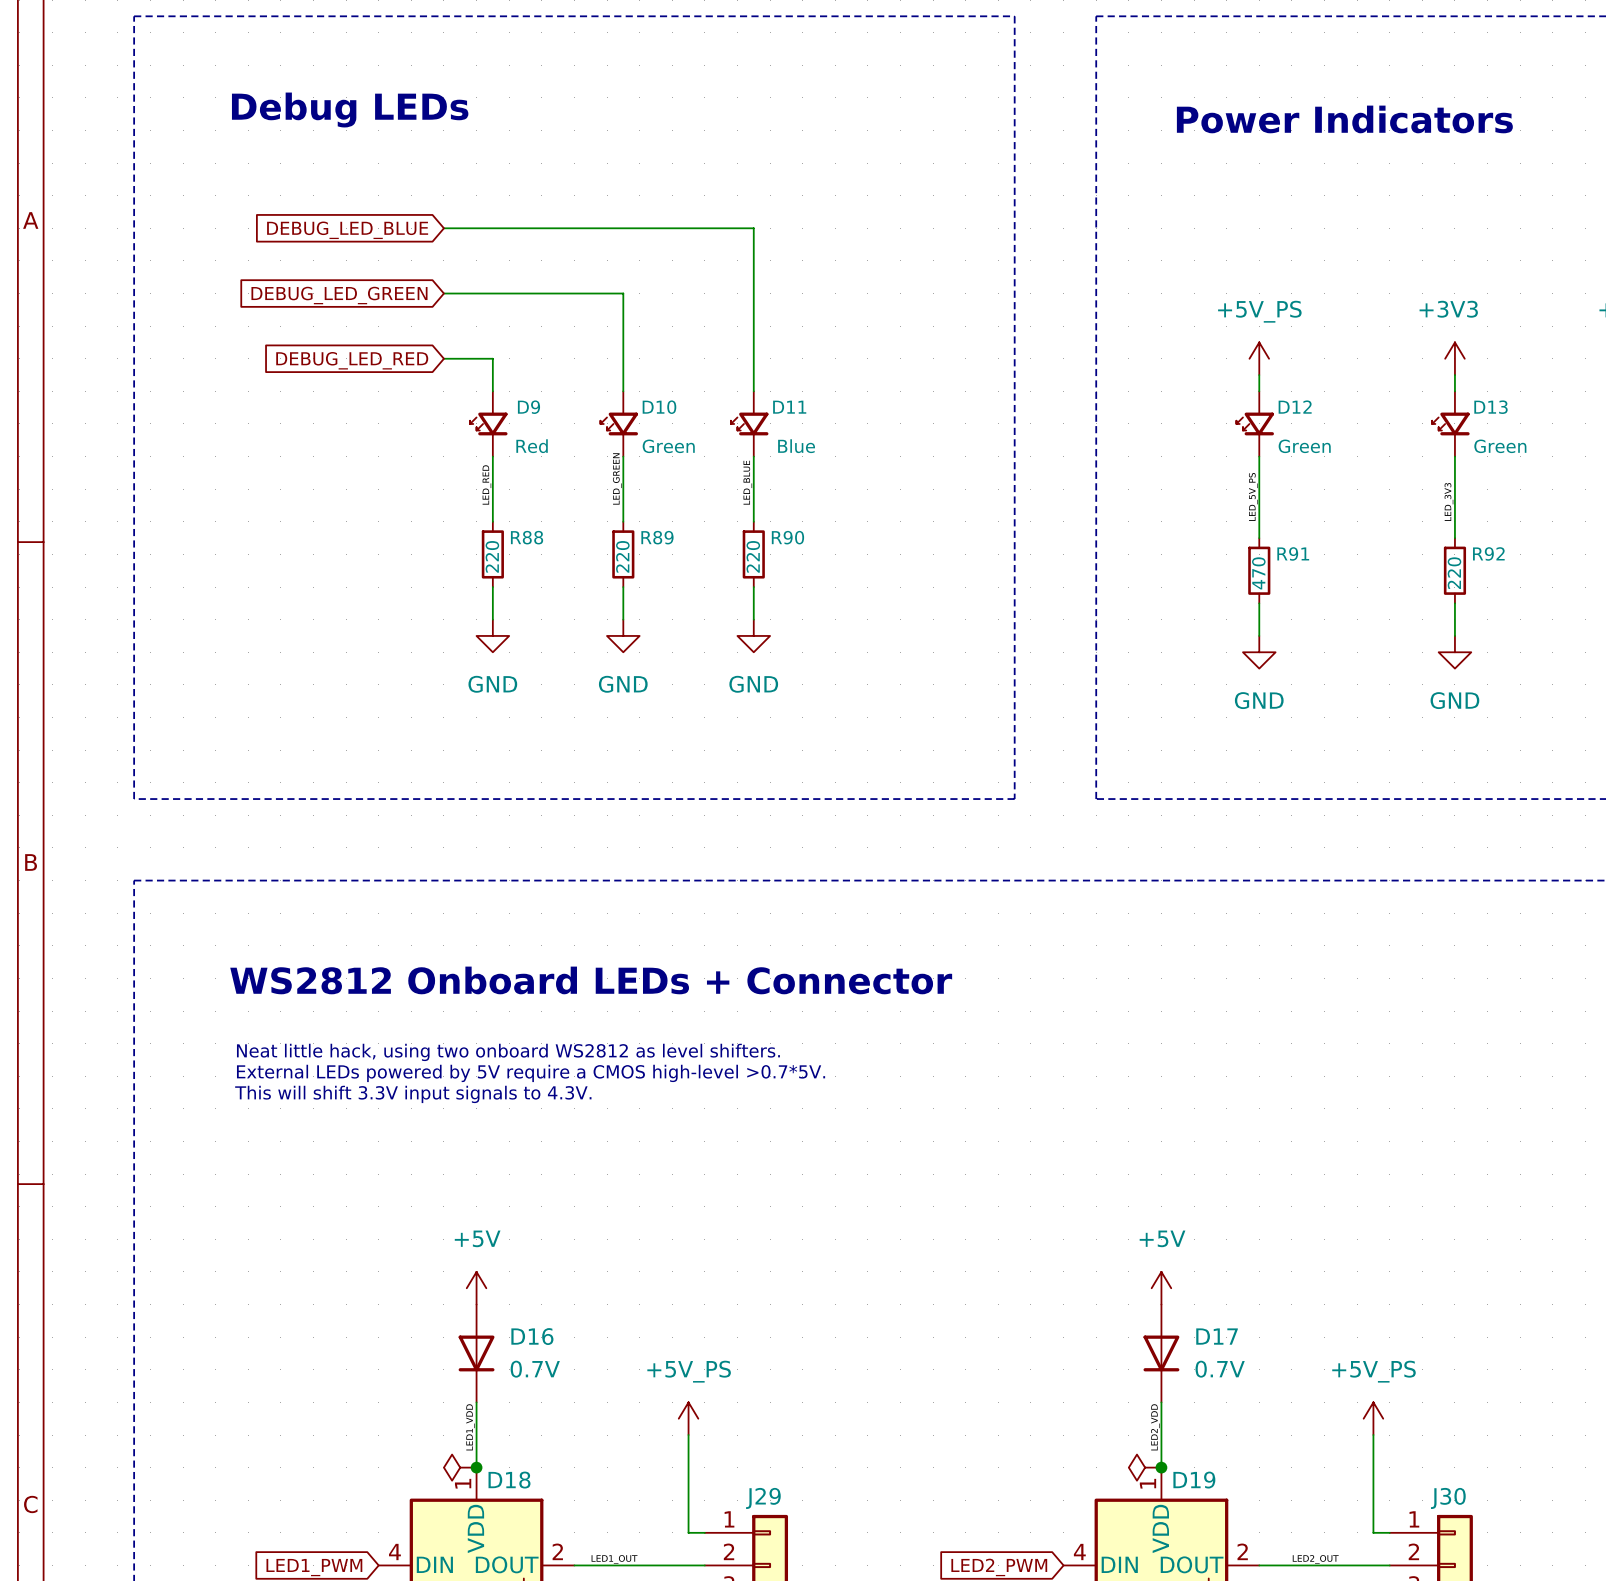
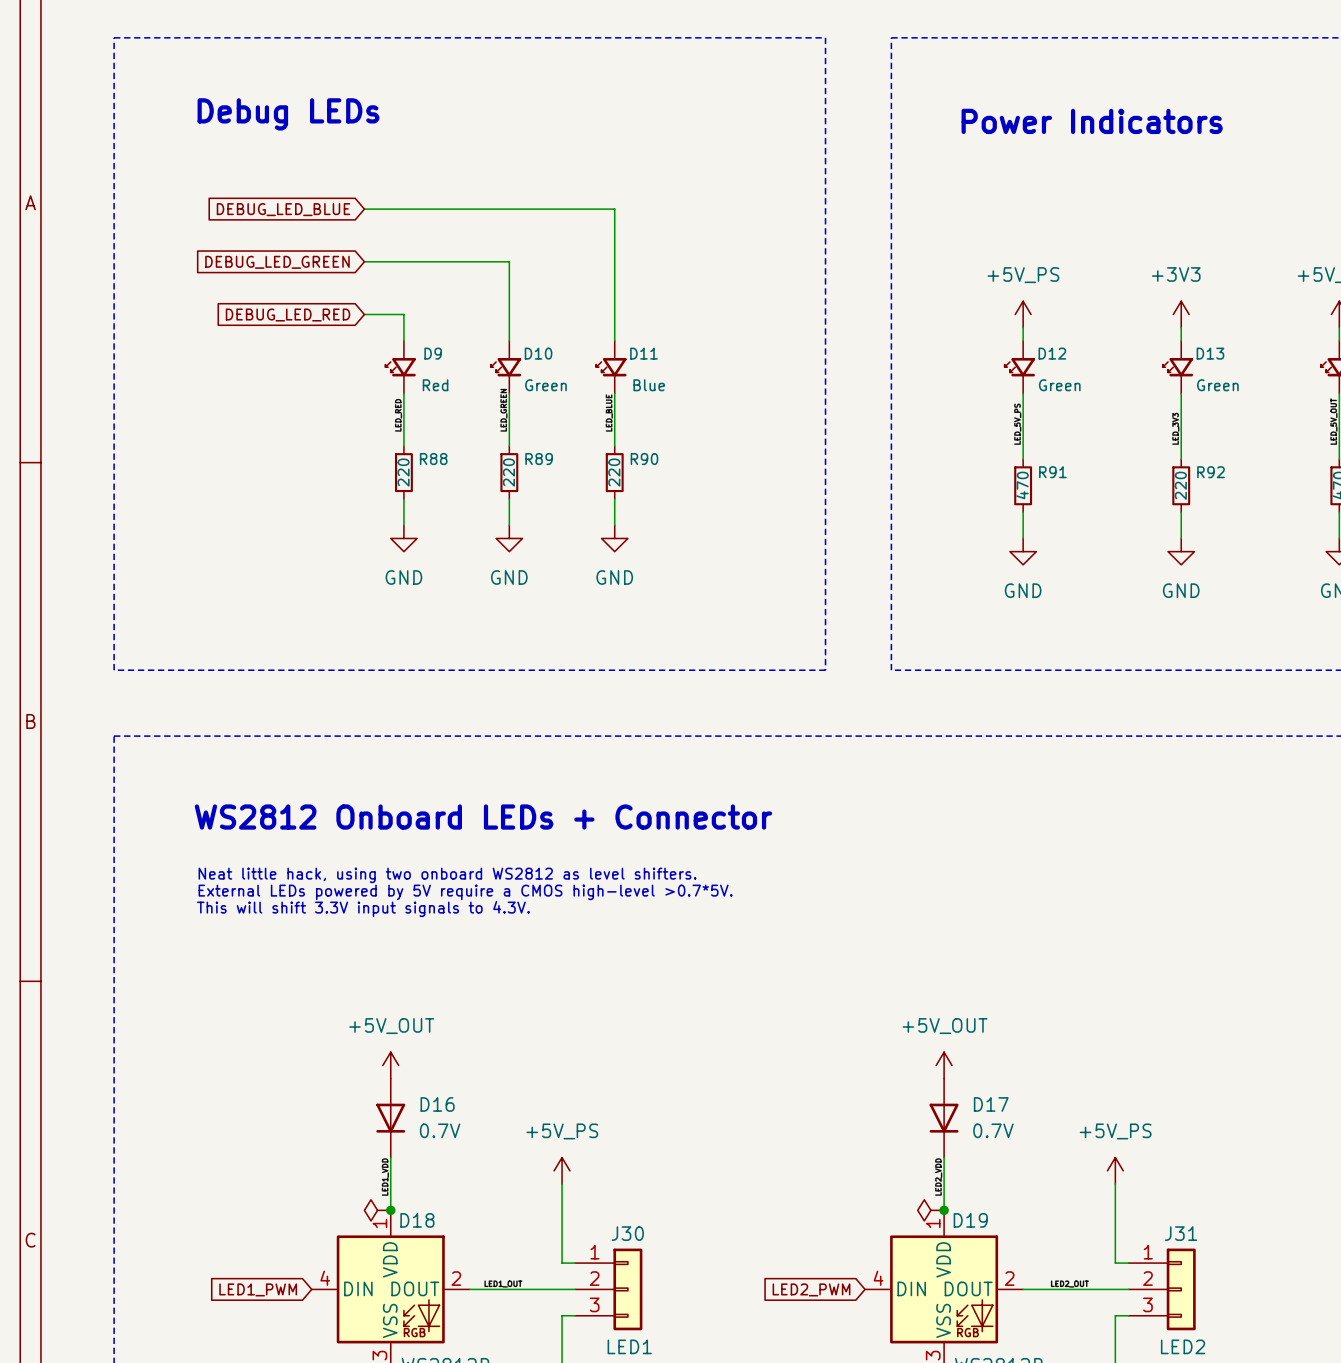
power symbol: +5V (476, 1288) -> +5V_OUT (390, 1065)
power symbol: +5V (1161, 1288) -> +5V_OUT (944, 1065)
J29 name: J29 (763, 1498) -> J30 (627, 1233)
J30 name: J30 (1448, 1498) -> J31 (1181, 1233)

